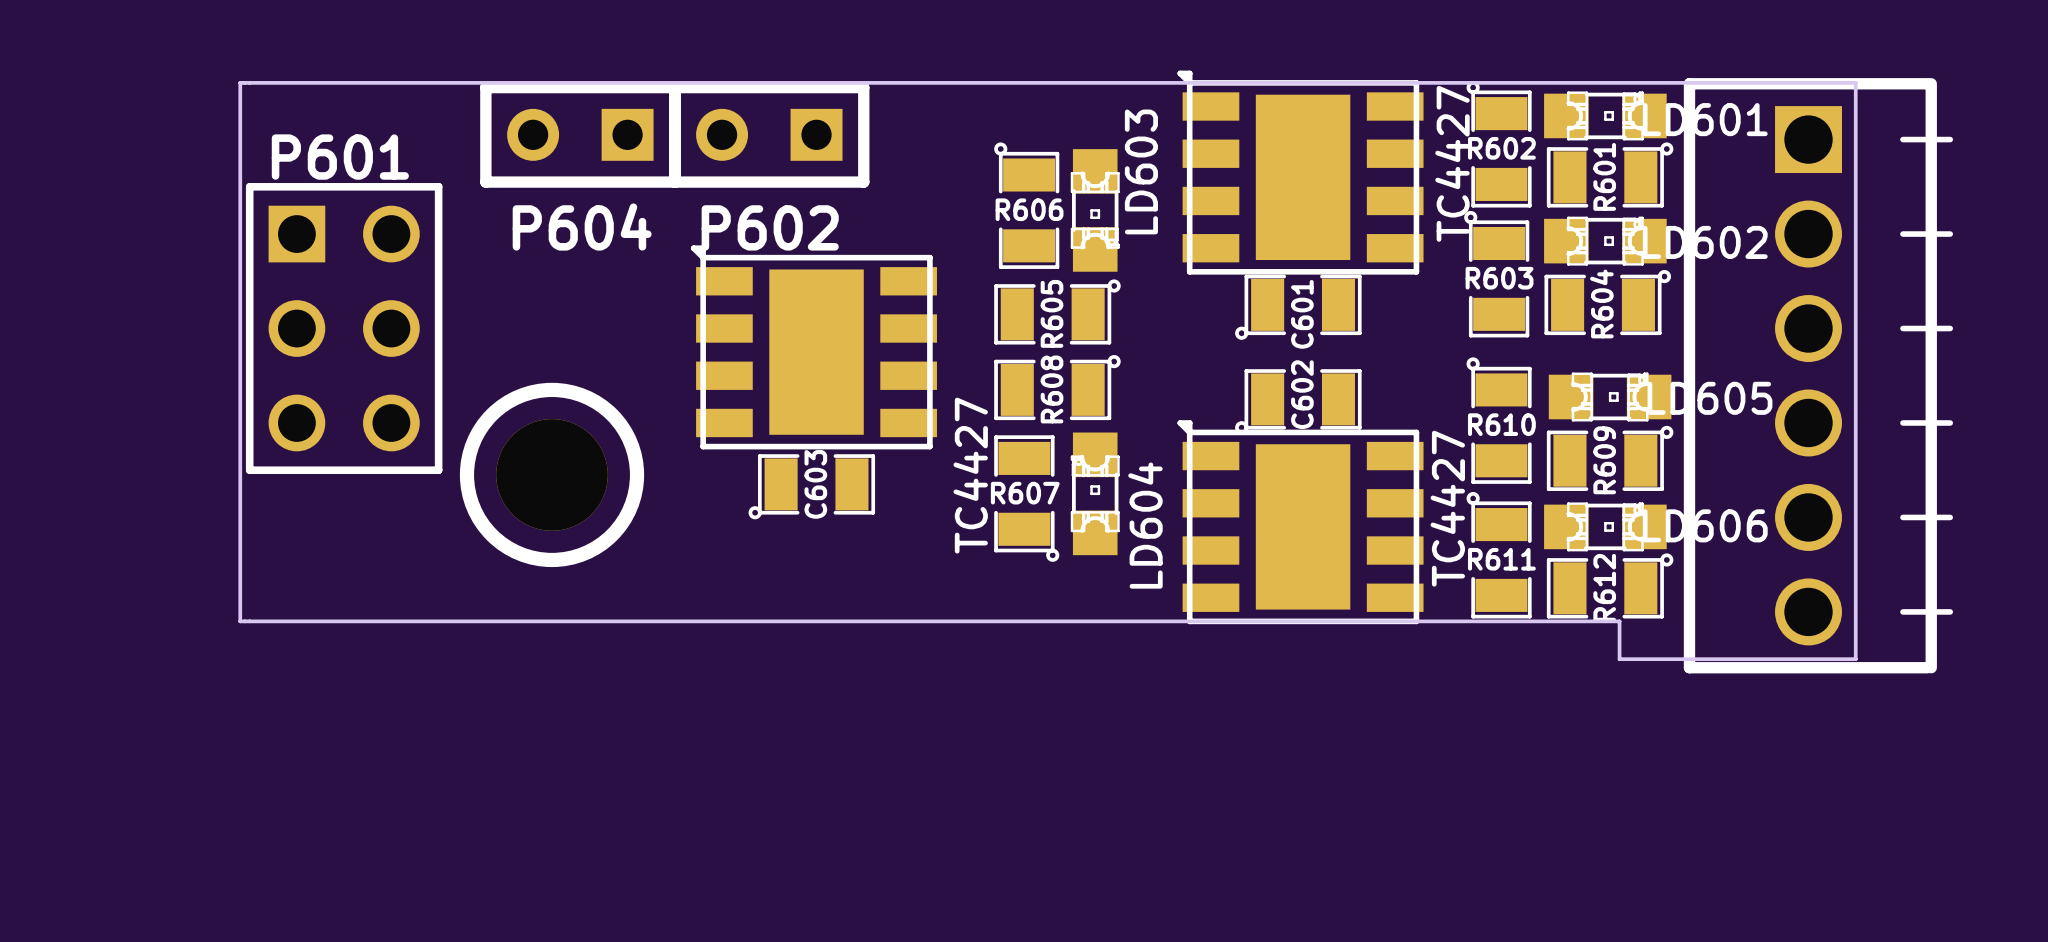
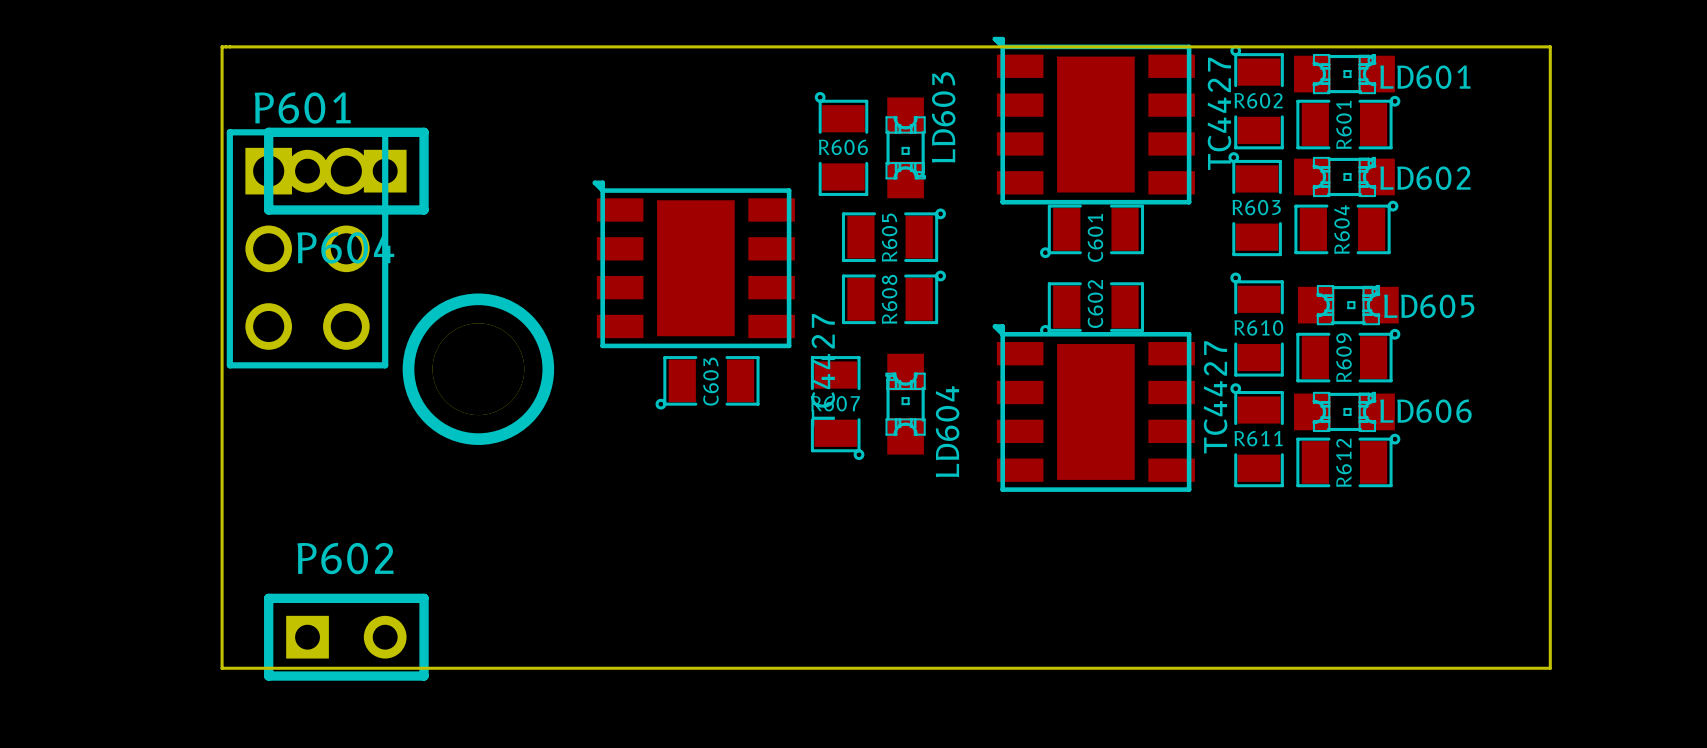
P604 position: (580, 134) -> (346, 171)
P602 rotation: 0° (769, 134) -> 180° (346, 637)
P602 position: (769, 134) -> (346, 637)
R606 position: (1026, 205) -> (841, 143)
LD603 position: (1095, 210) -> (905, 147)
part: (1818, 375) -> none
C603 position: (811, 486) -> (707, 382)
LD604 position: (1095, 493) -> (905, 404)
R607 position: (1026, 498) -> (837, 408)
board edge: (240, 621) (1619, 621) (1619, 659) (1855, 659) -> (222, 489) (222, 668) (1550, 668) (1550, 520)

